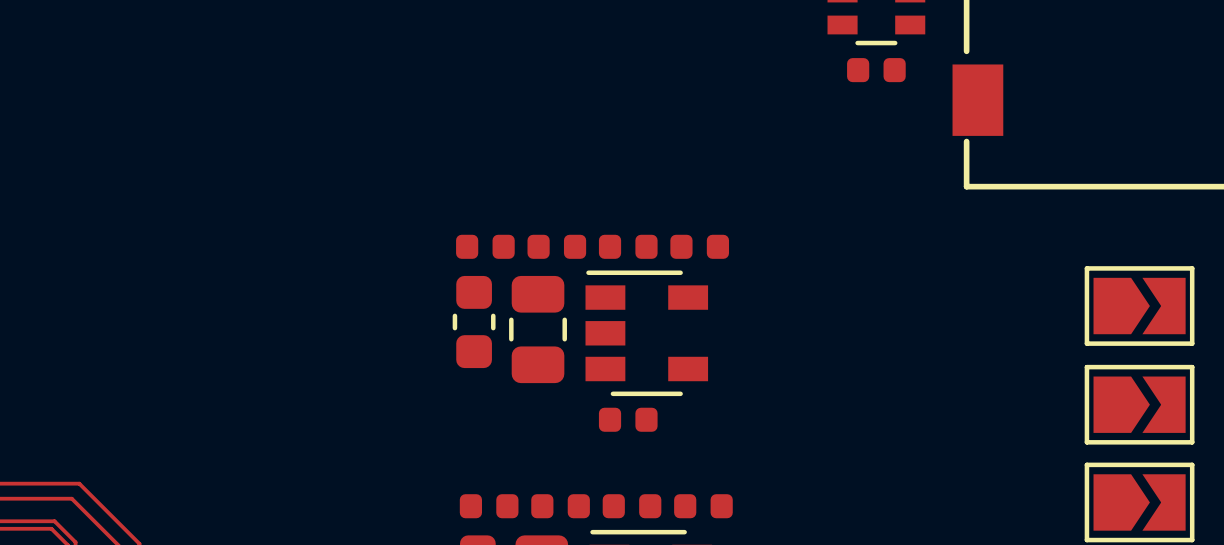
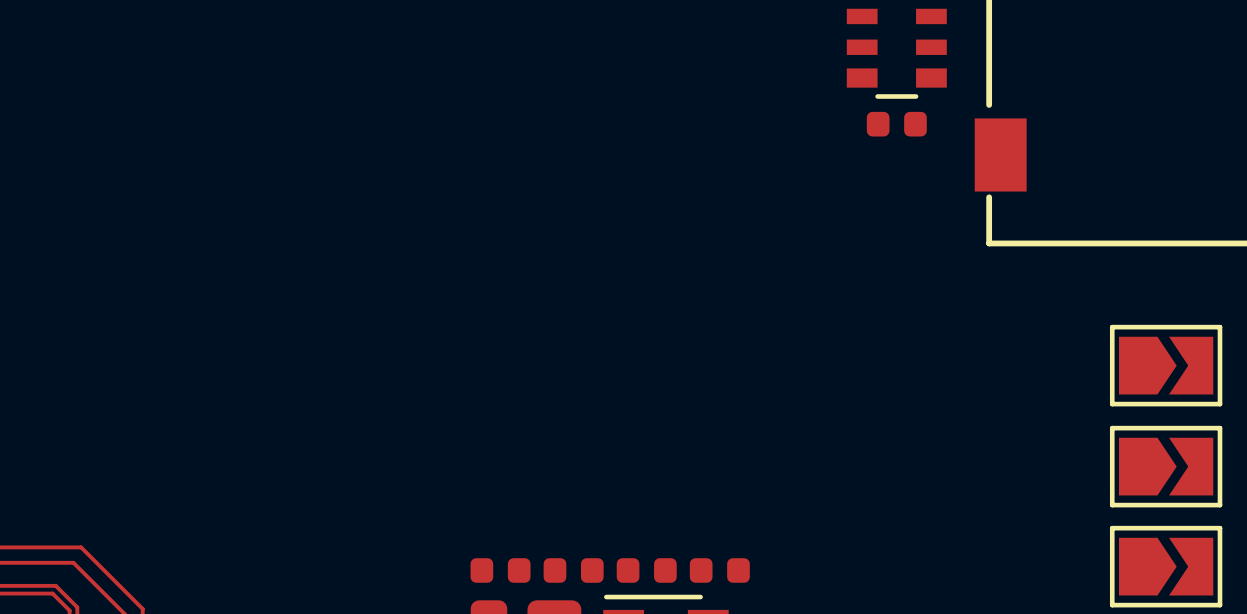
part: (485, 246) -> none
part: (556, 246) -> none
part: (628, 246) -> none
part: (699, 246) -> none
part: (474, 322) -> none
part: (538, 329) -> none
part: (646, 333) -> none
part: (628, 419) -> none

